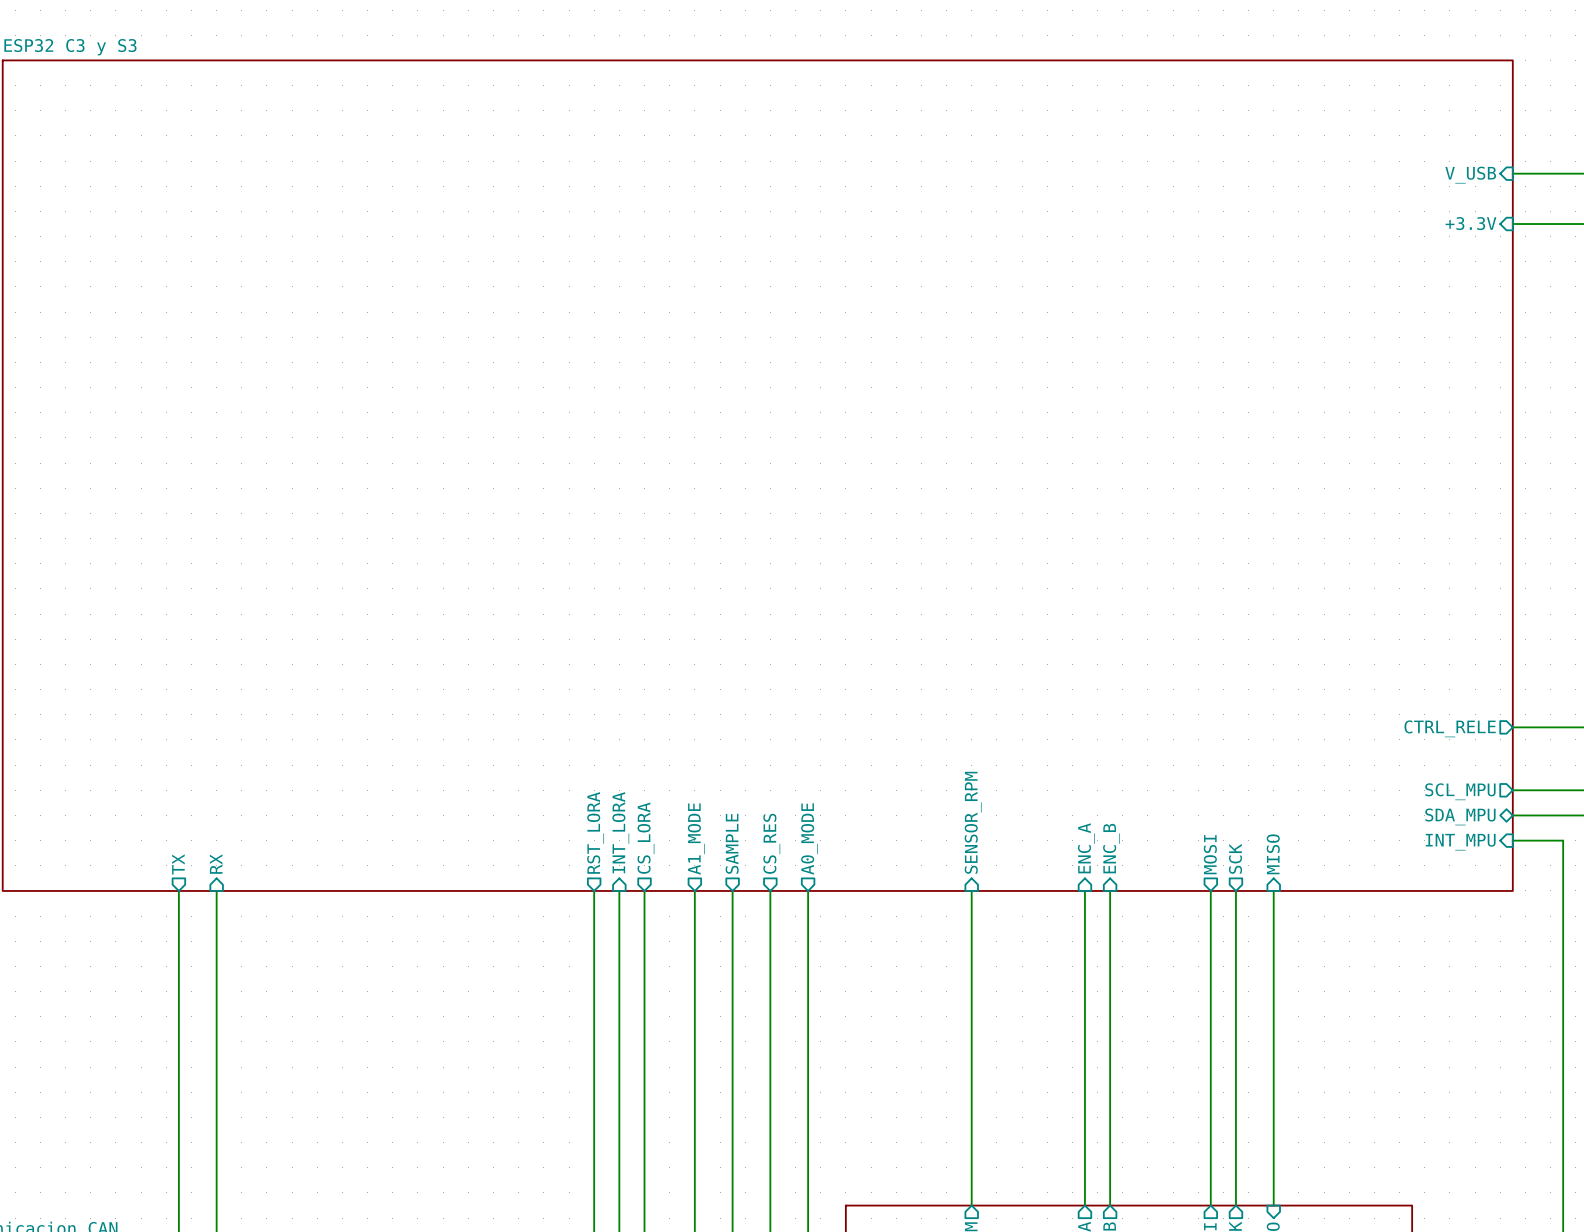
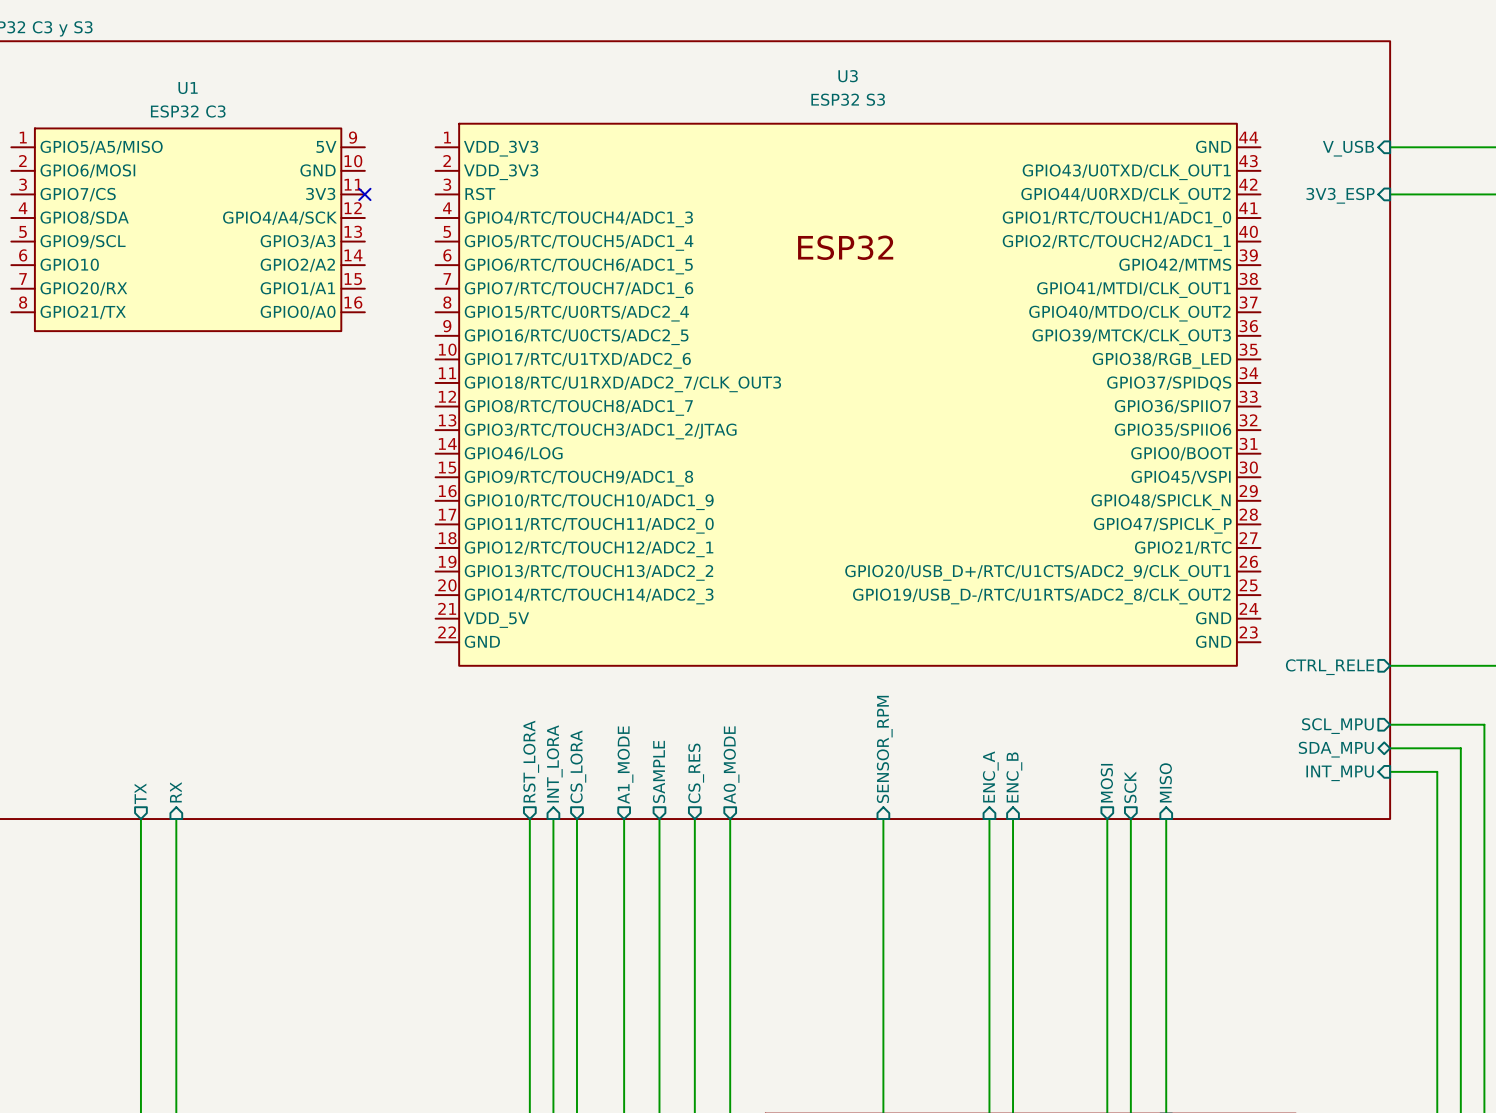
sheet pin: +3.3V (1470, 223) -> 3V3_ESP (1340, 195)
no-connect mark: none -> (364, 194)
U1: none -> ESP32 C3 (188, 229)
U3: none -> ESP32 S3 (848, 394)

